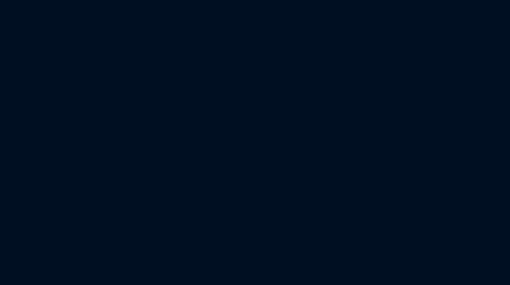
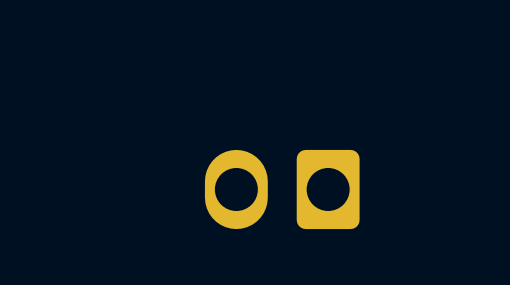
part: none -> (282, 189)

